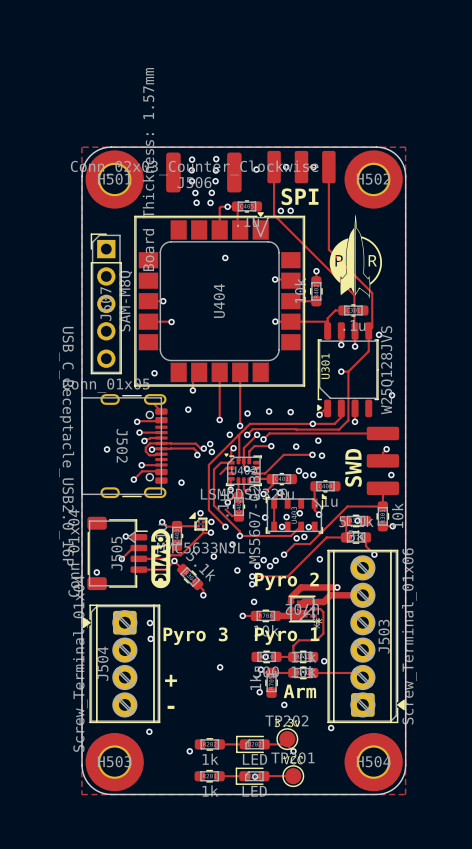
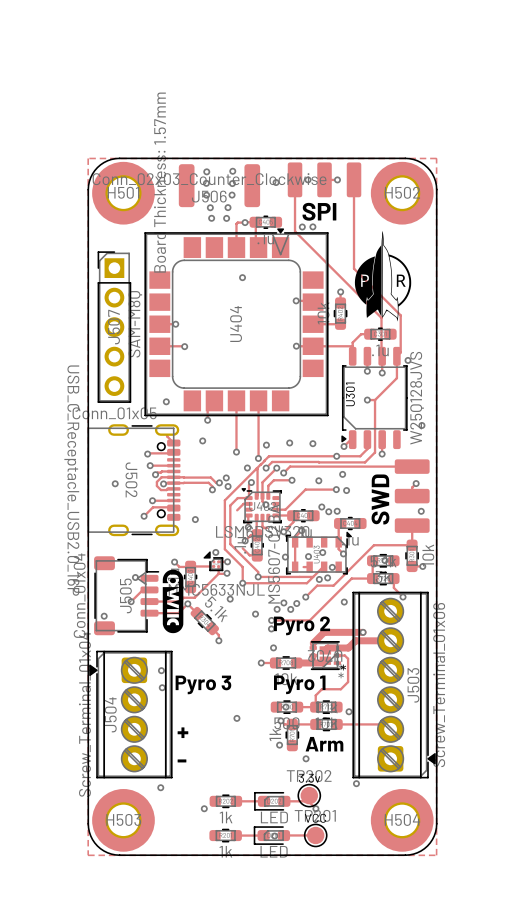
track: none -> (242, 567) (242, 583) (306, 583) (313, 576)
via: (225, 526) -> none
via: (282, 526) -> none
via: none -> (242, 583)
via: (232, 544) -> none

